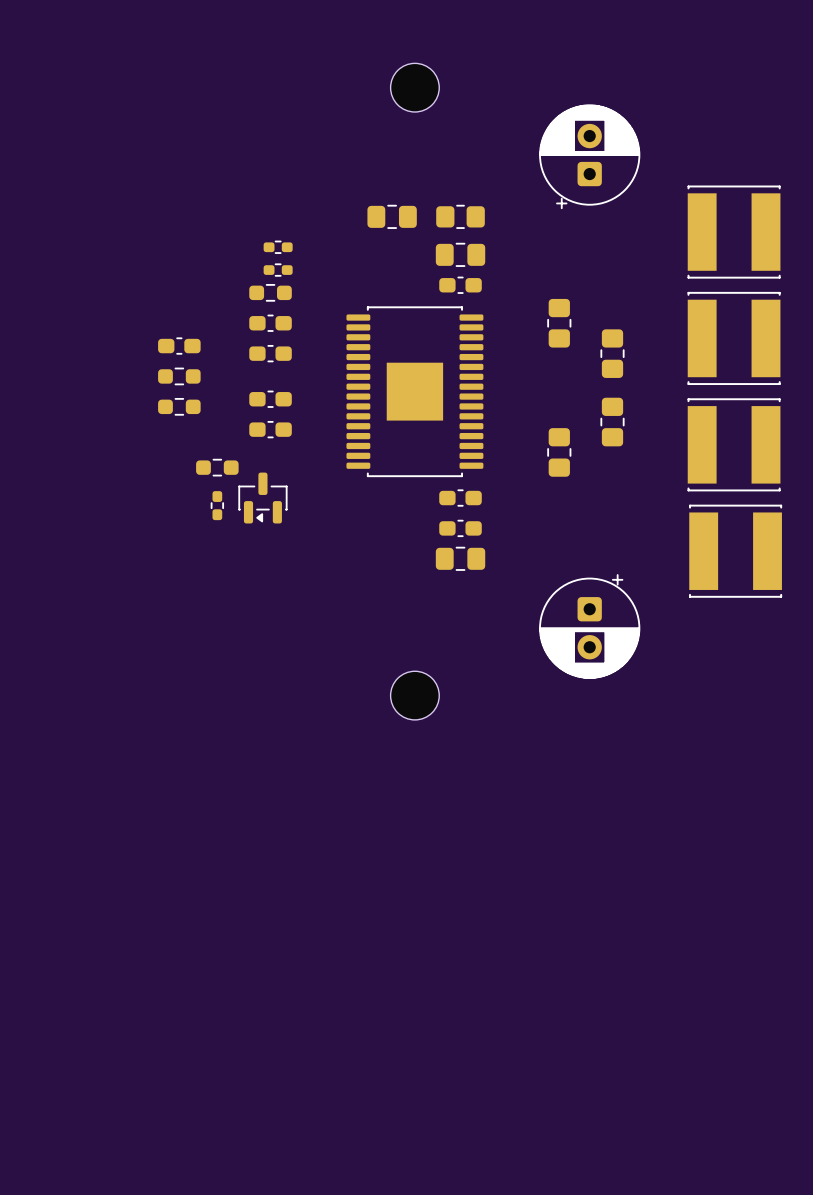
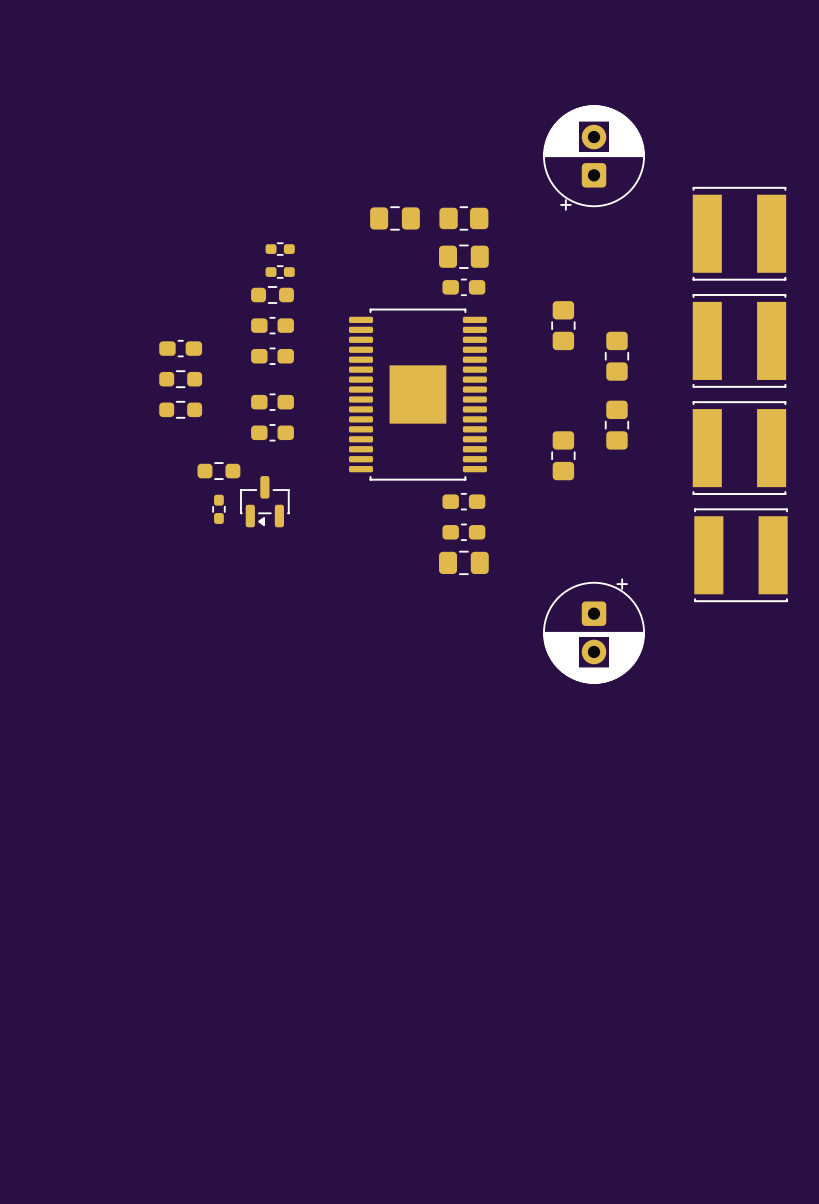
part: (414, 87) -> none
part: (414, 695) -> none

